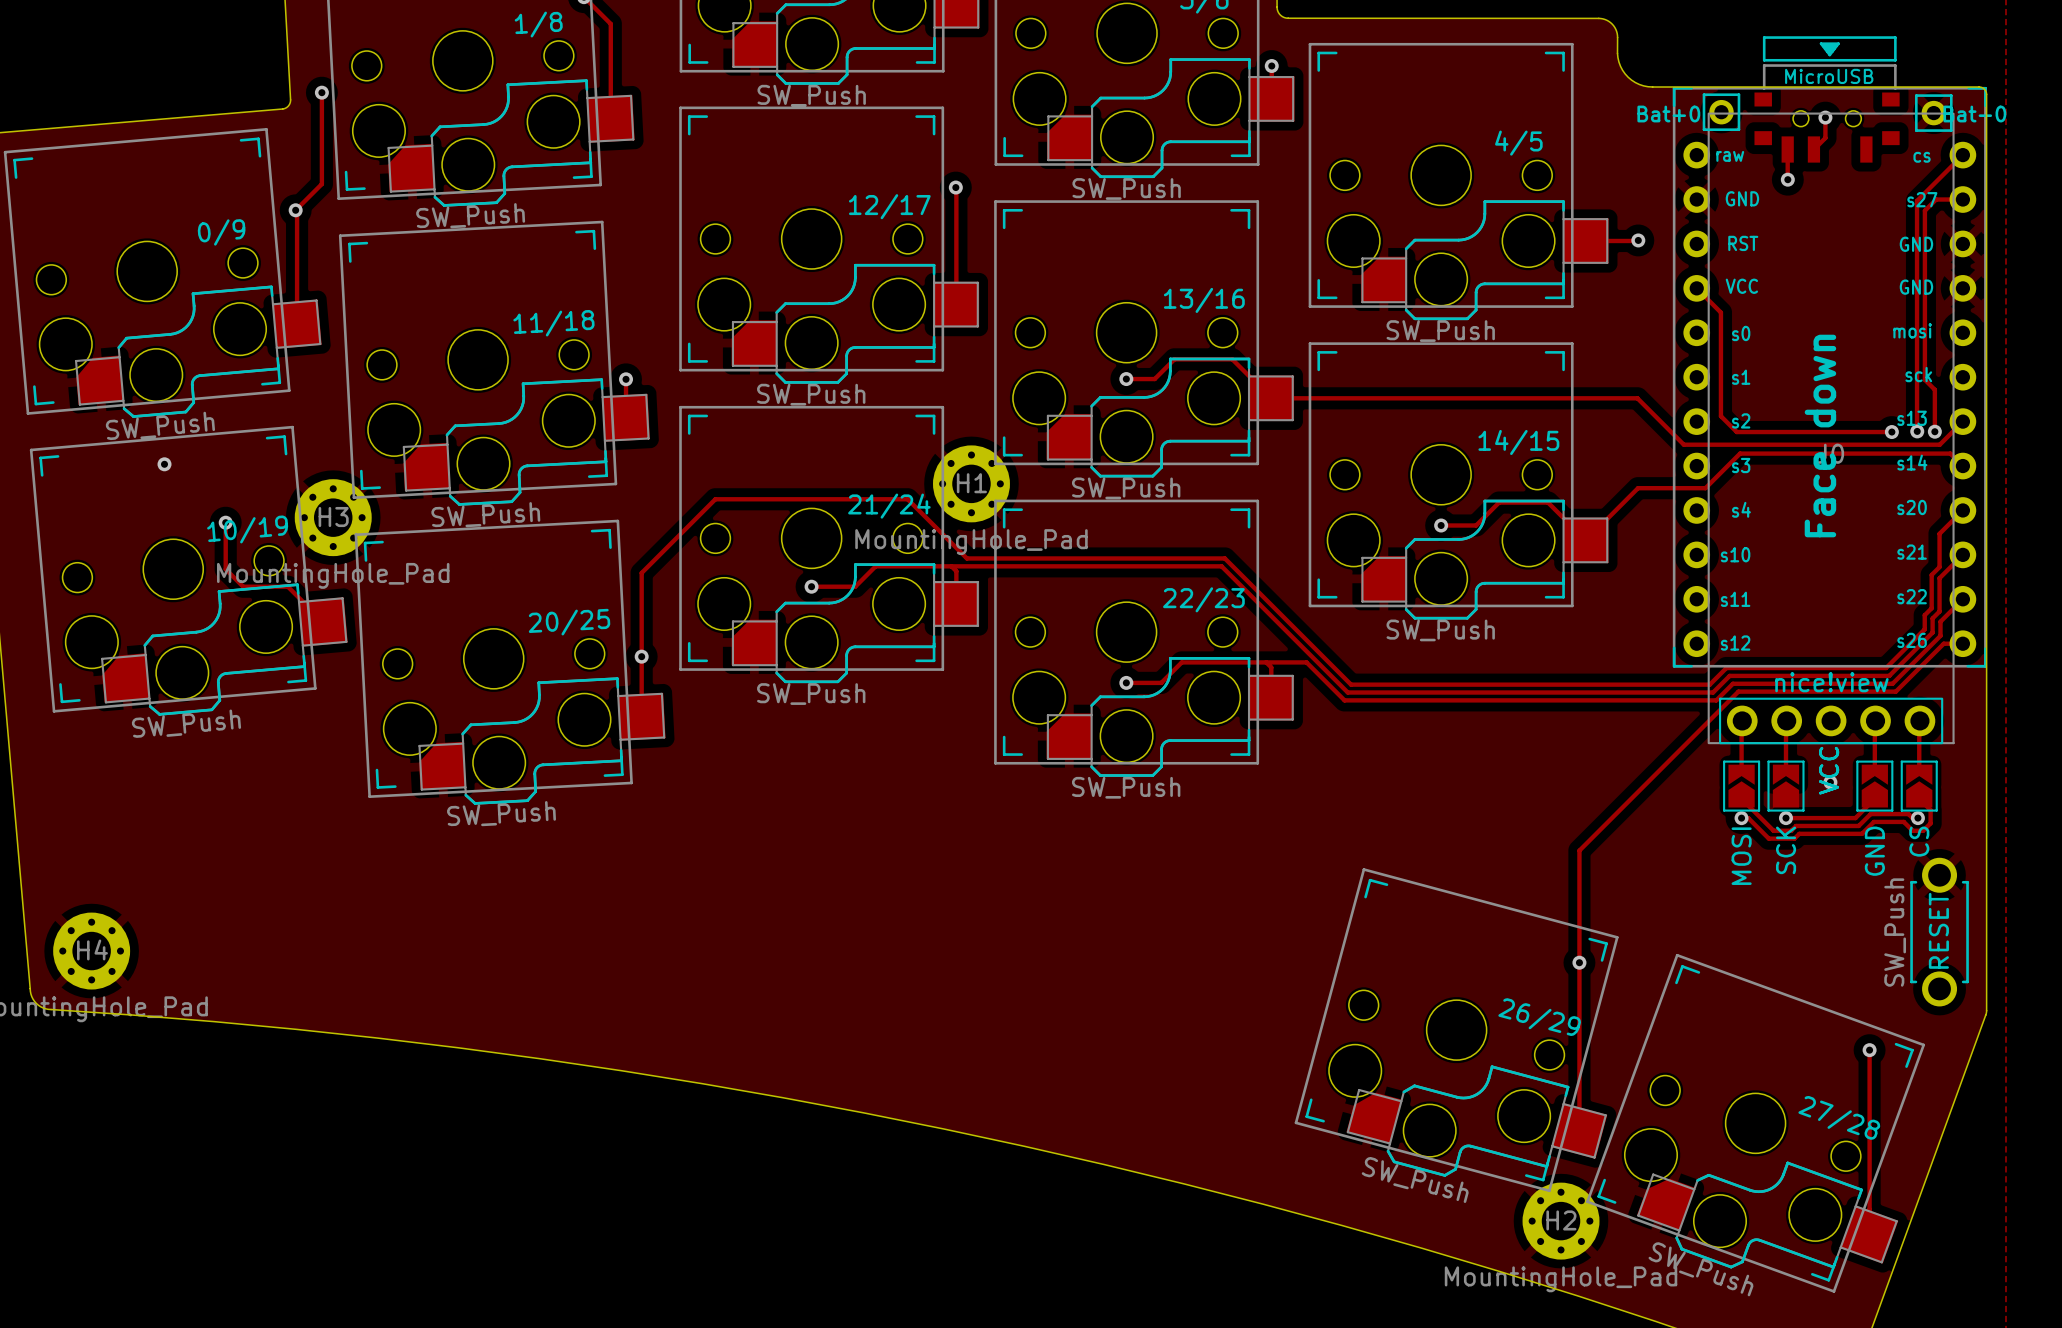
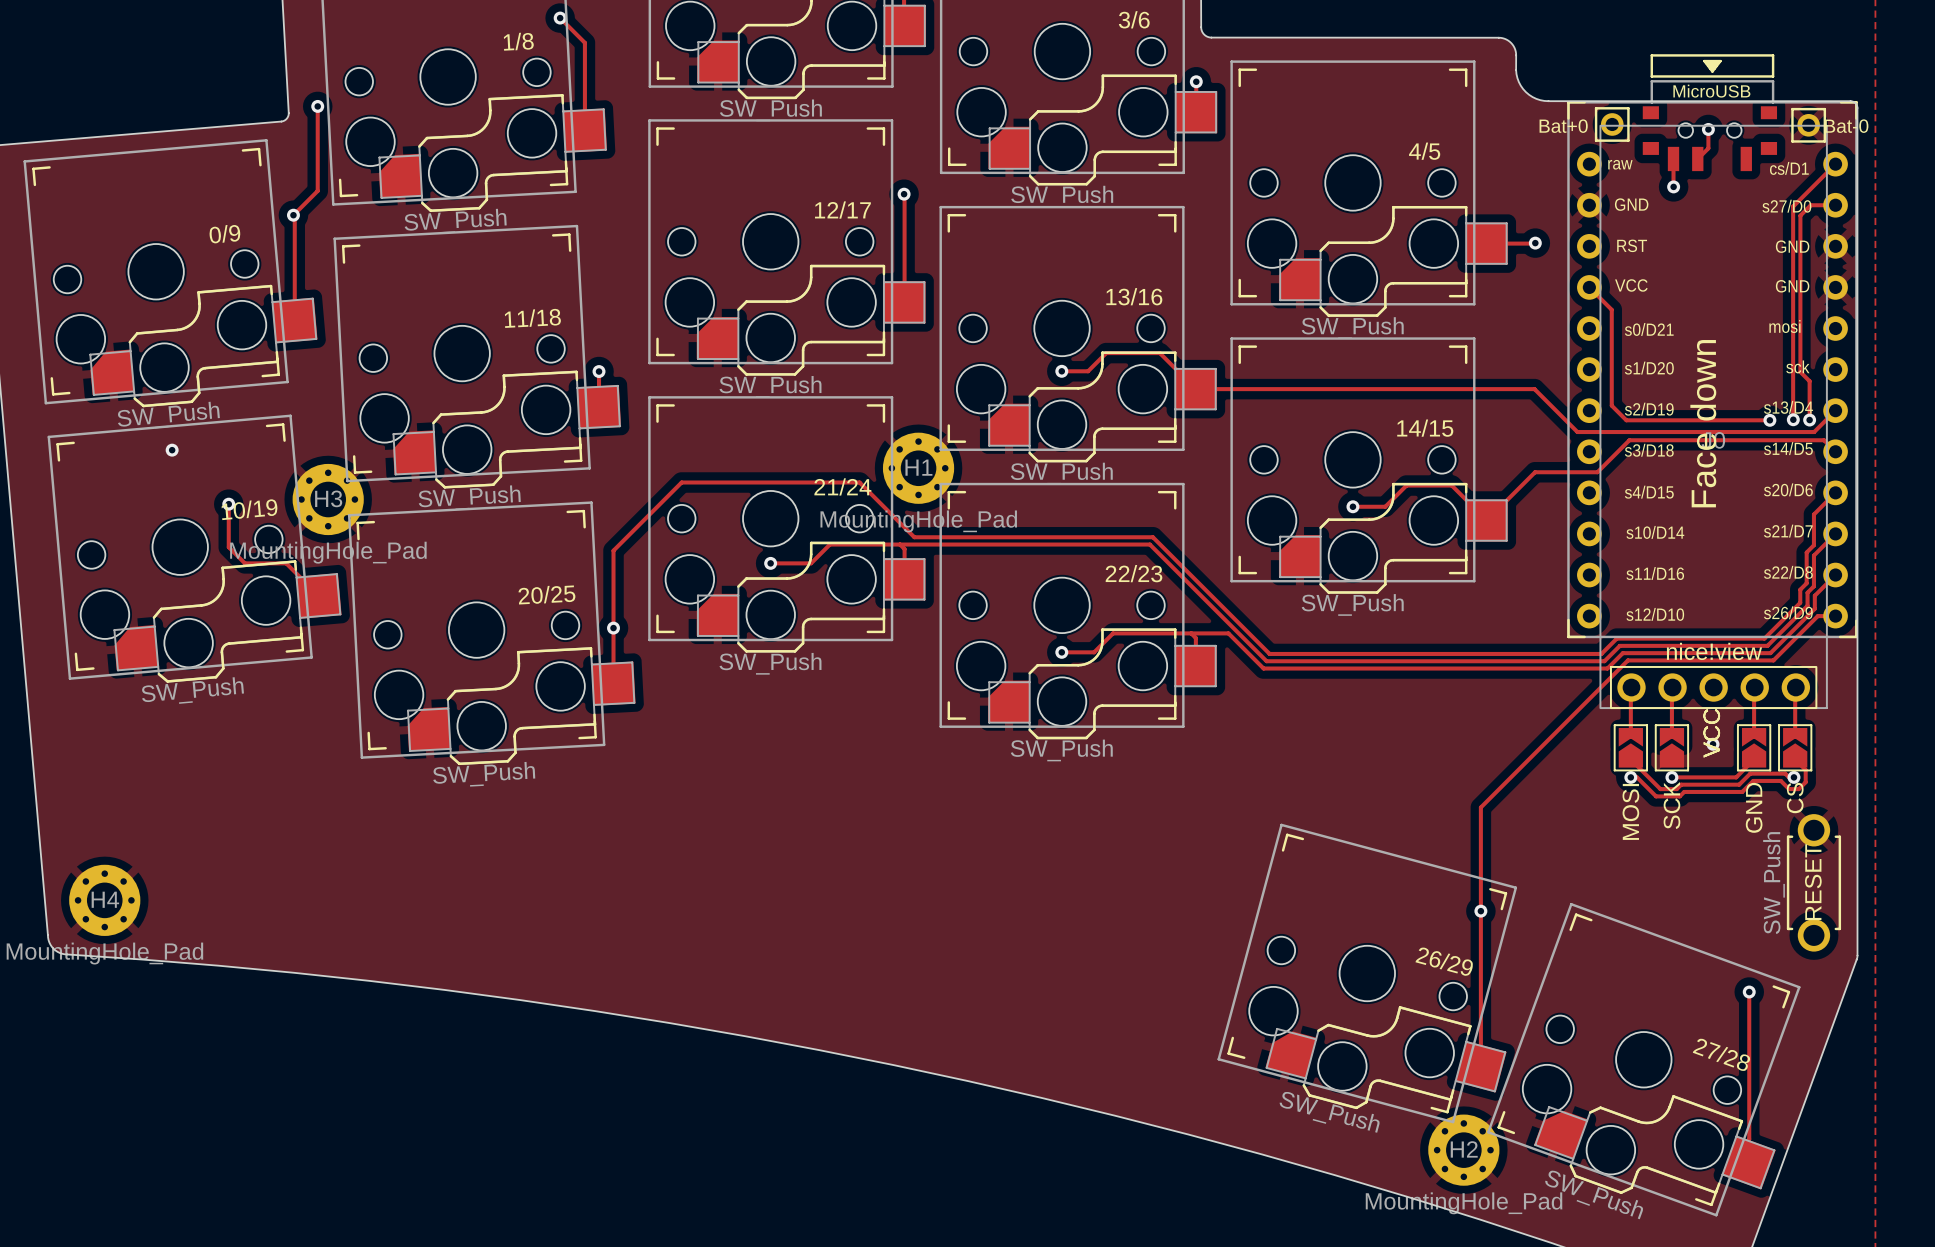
part footprint: [1672, 36, 1987, 668] -> [1567, 54, 1858, 639]
text: s14 (1912, 462) -> s14/D5 (1788, 448)

